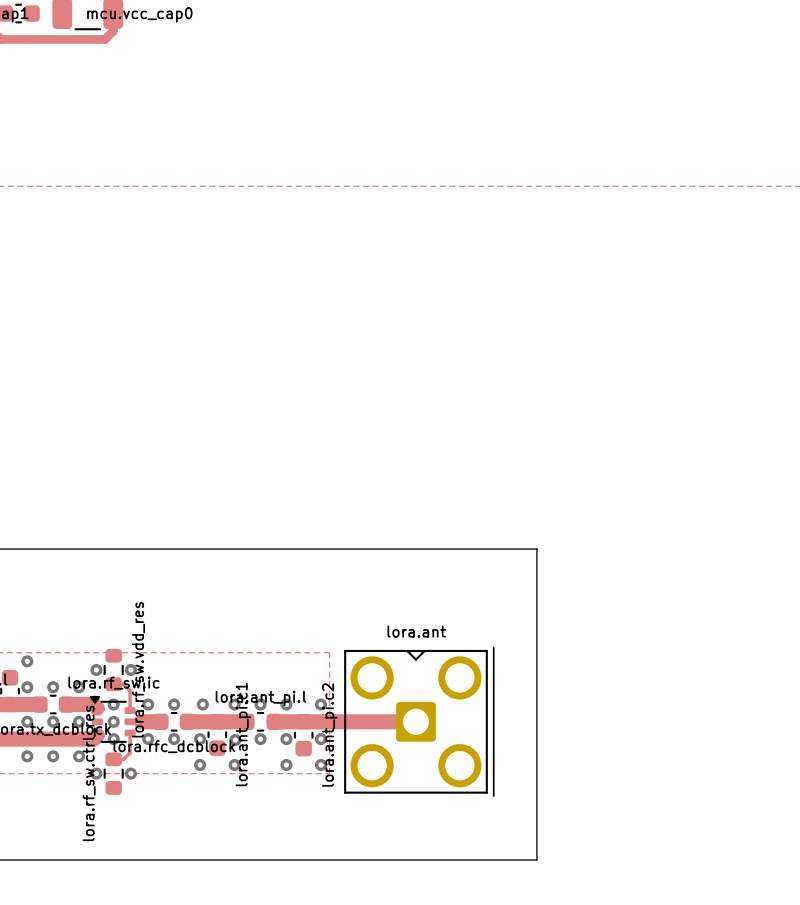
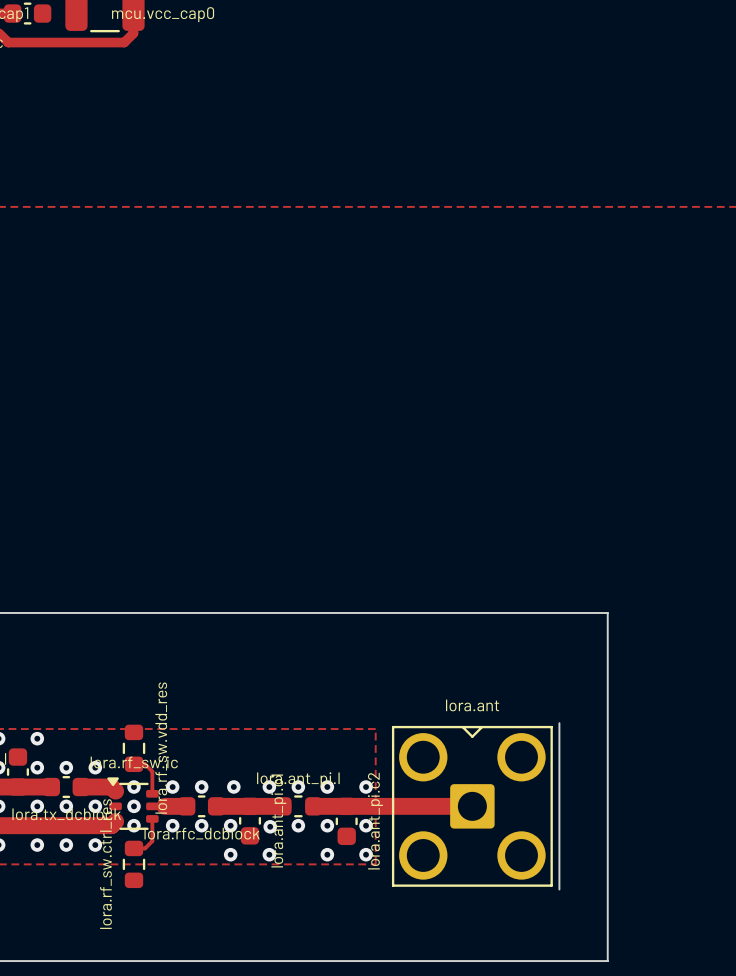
via: (96, 669) -> none
via: (130, 669) -> none
via: (96, 773) -> none
via: (130, 773) -> none

